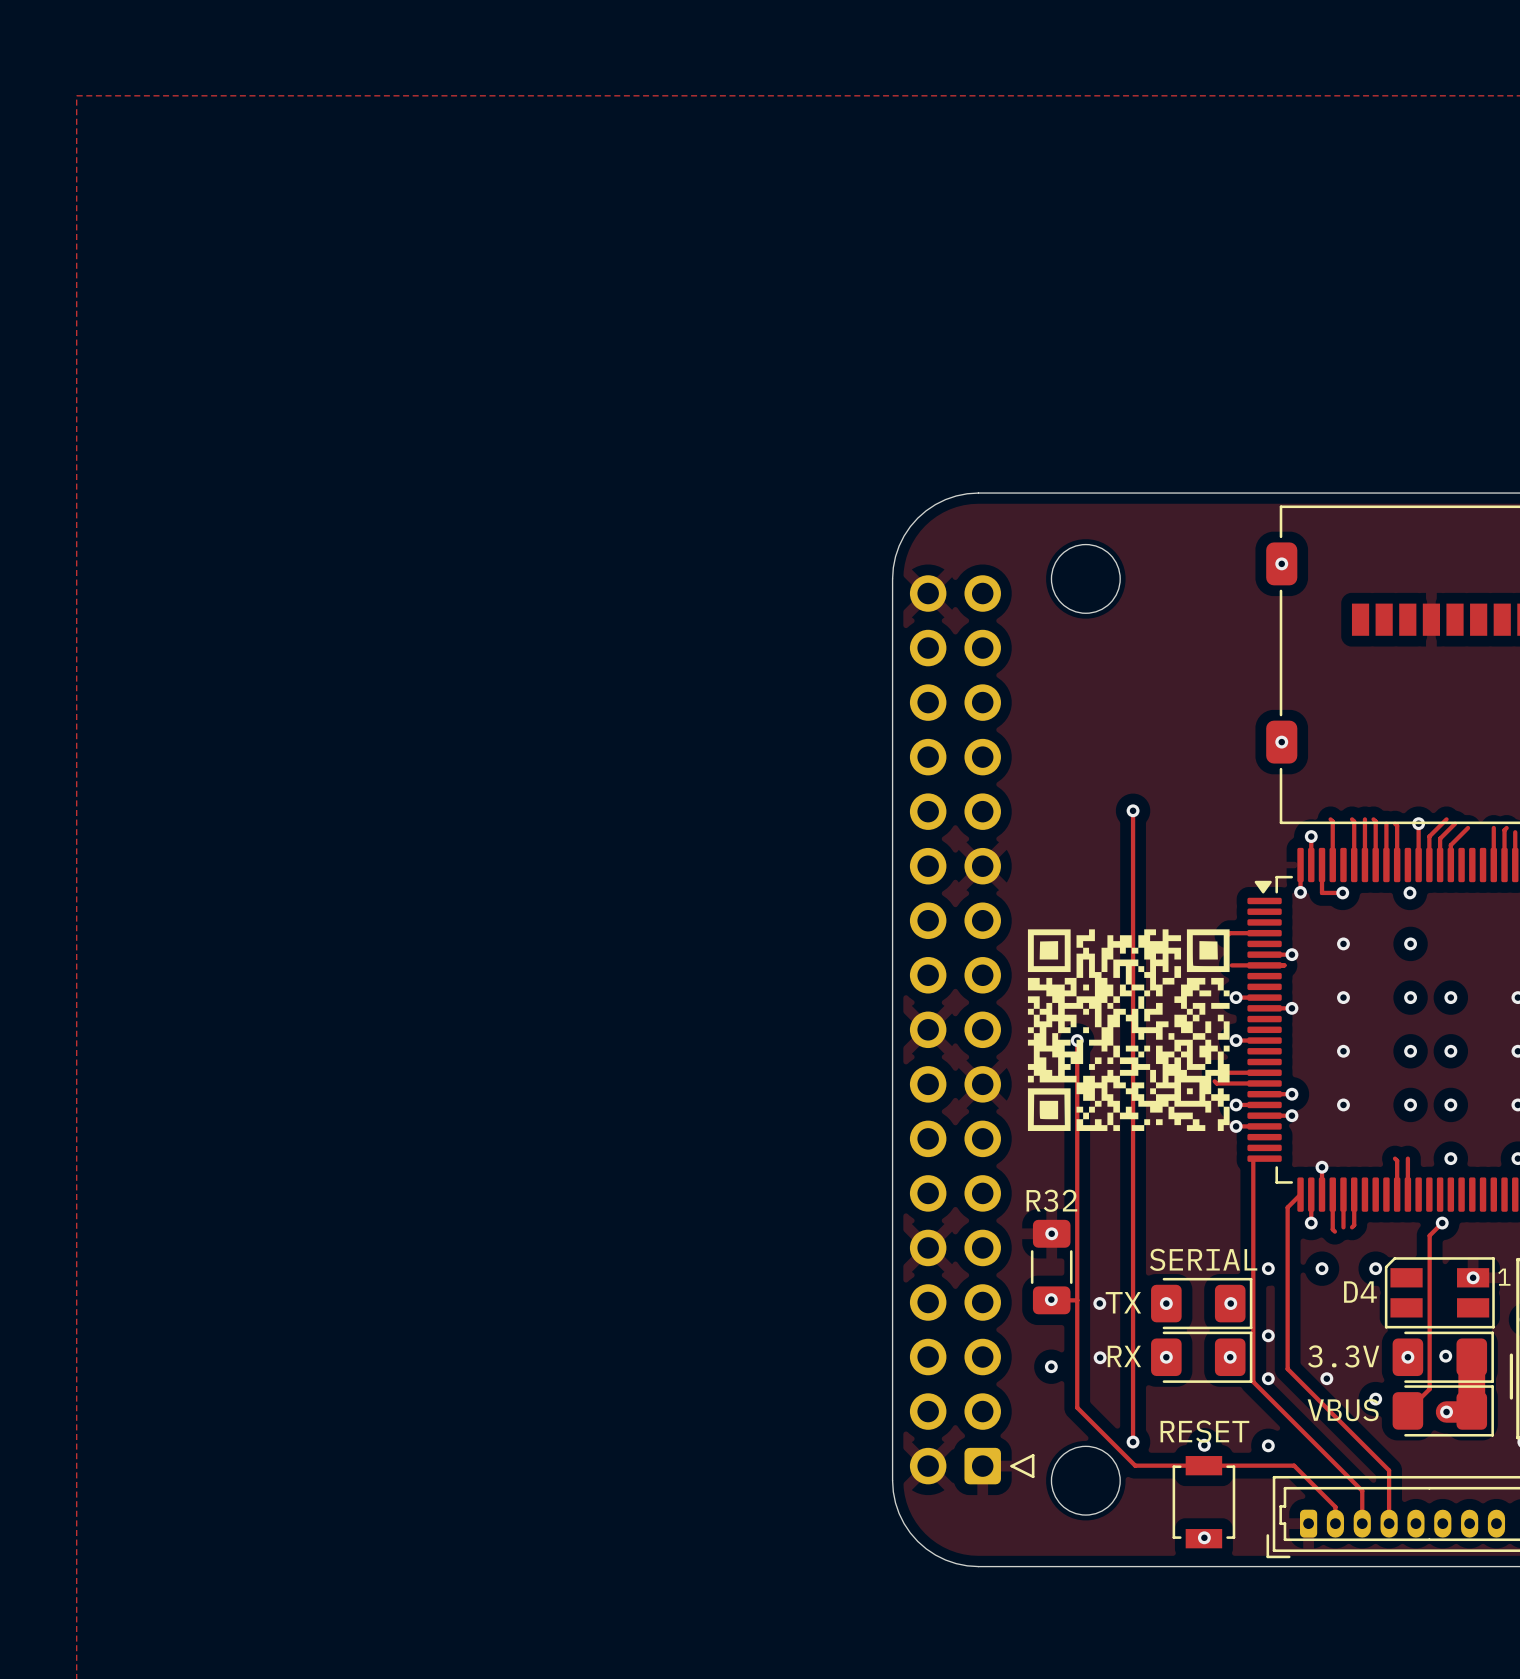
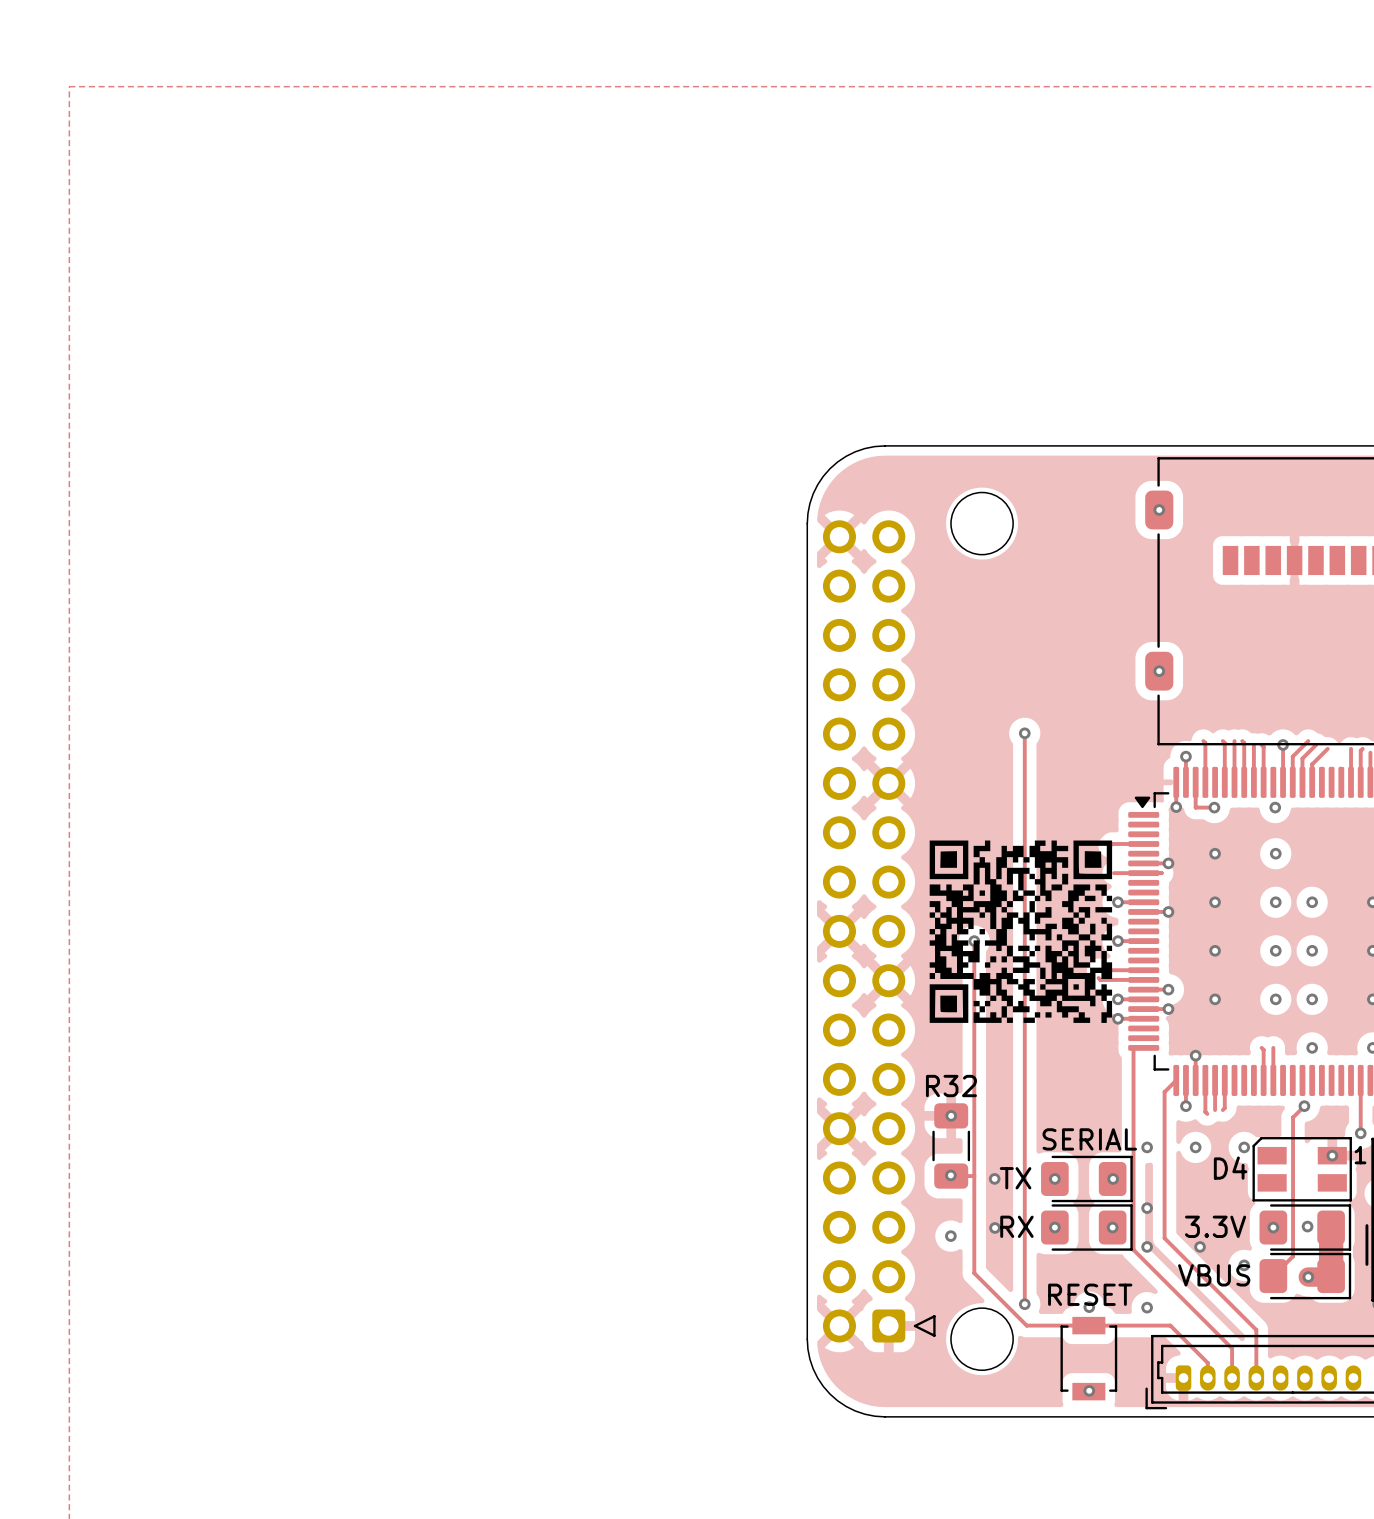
track: none -> (1360, 1080) (1360, 1133)
via: none -> (1360, 1133)

